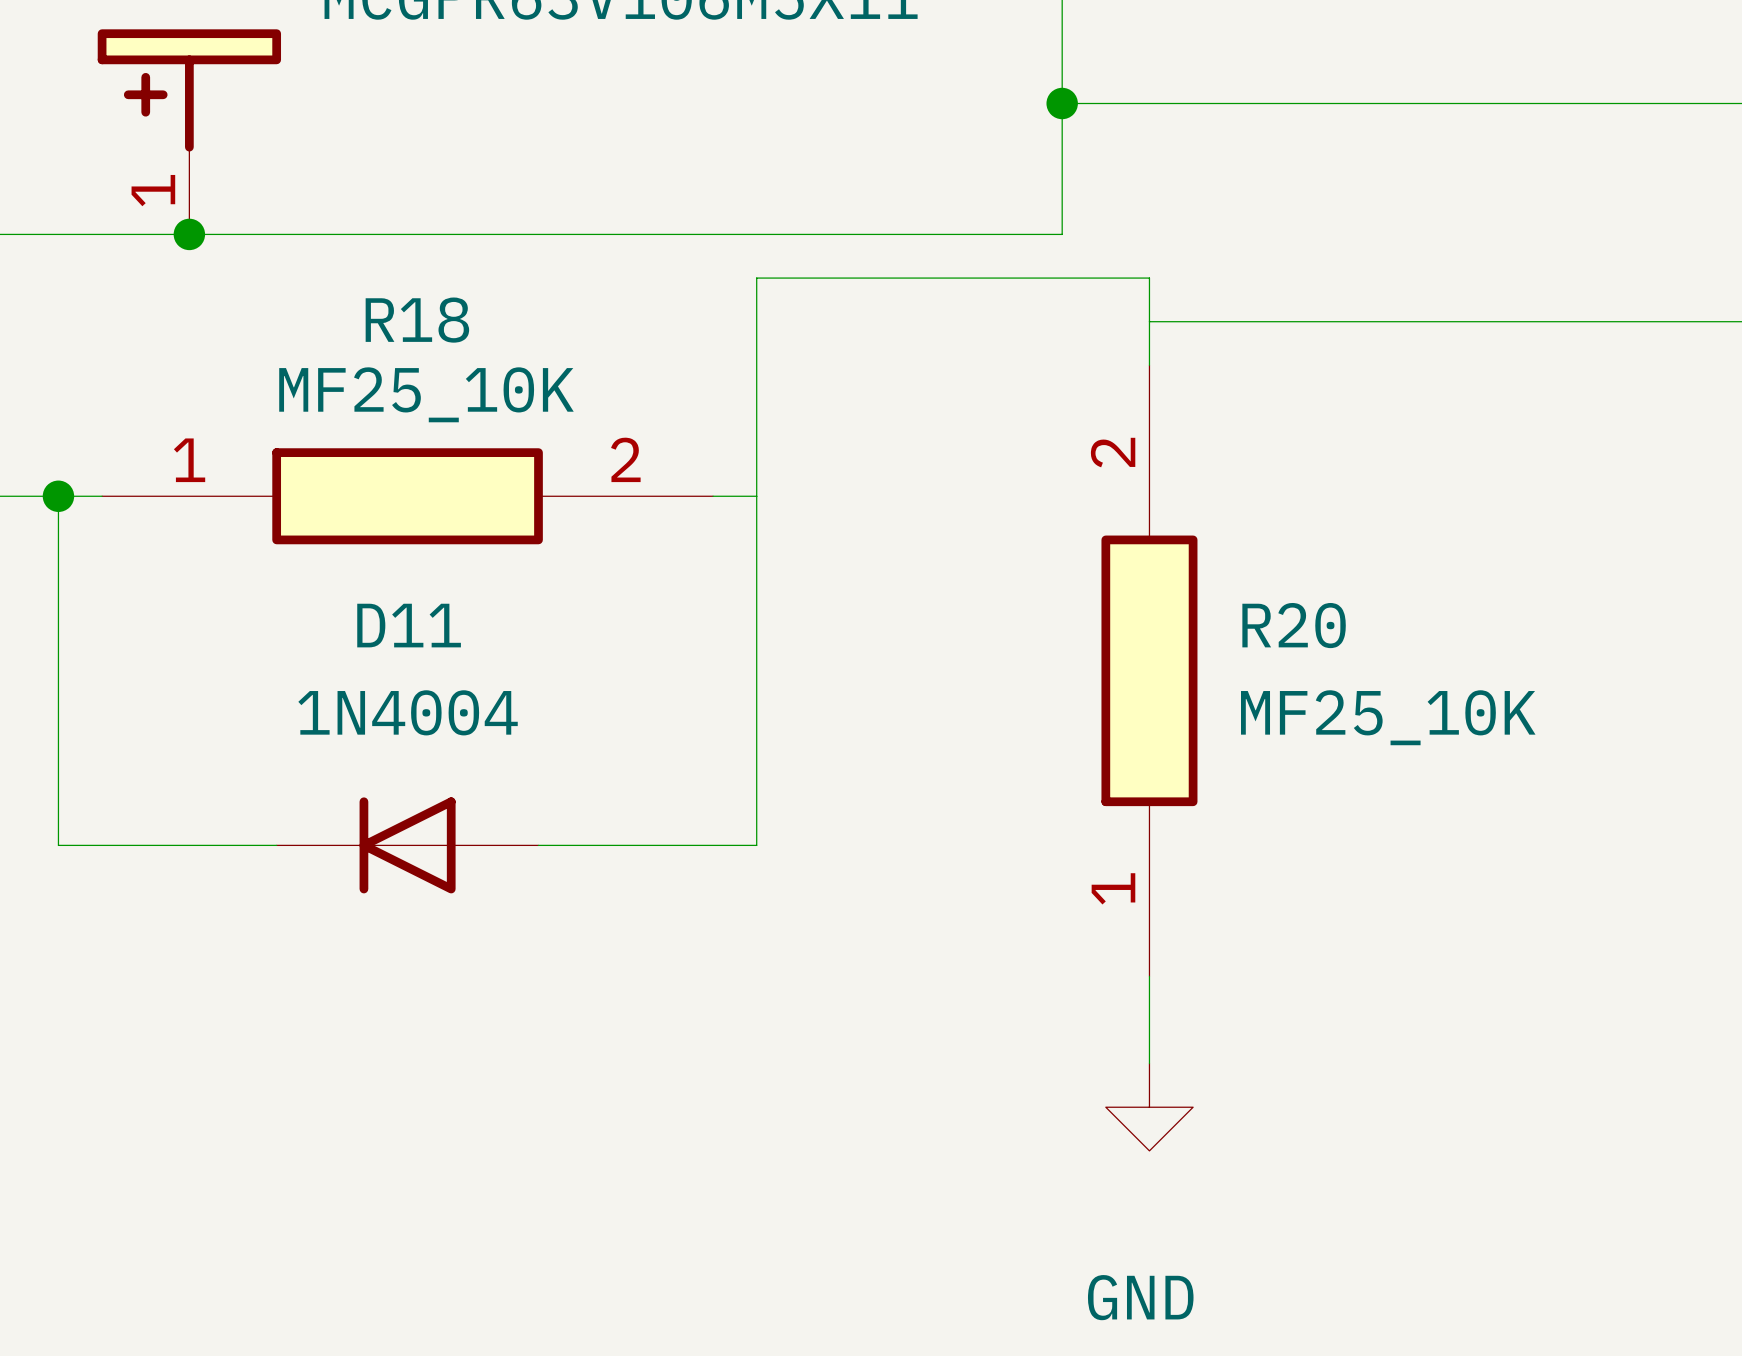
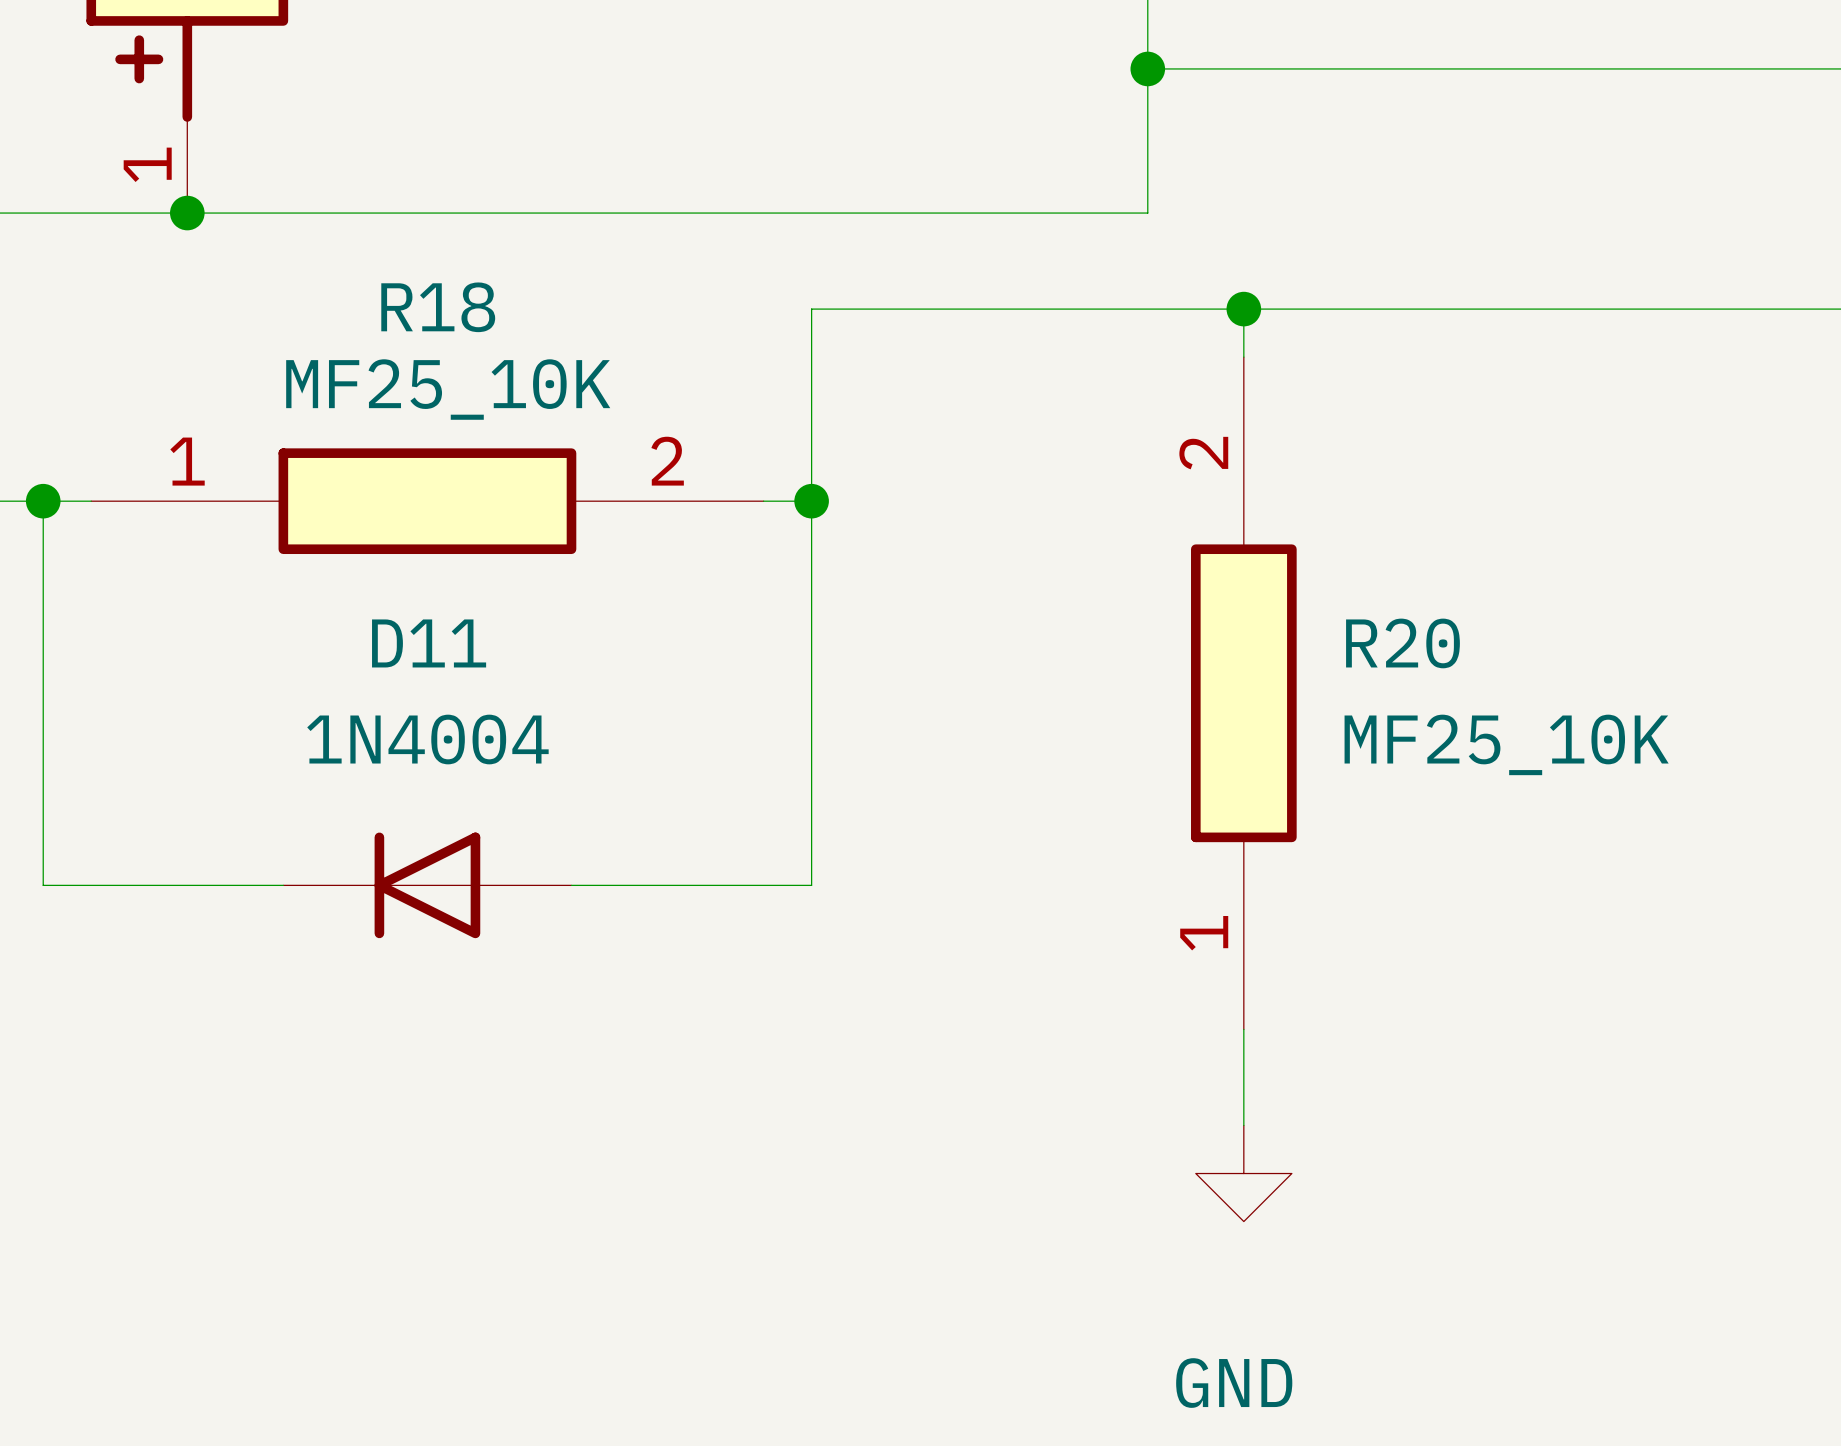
wire: (756, 321) (756, 278) (1149, 278) (1149, 321) -> (811, 309) (1243, 309)
junction: none -> (1243, 309)
junction: none -> (811, 501)

